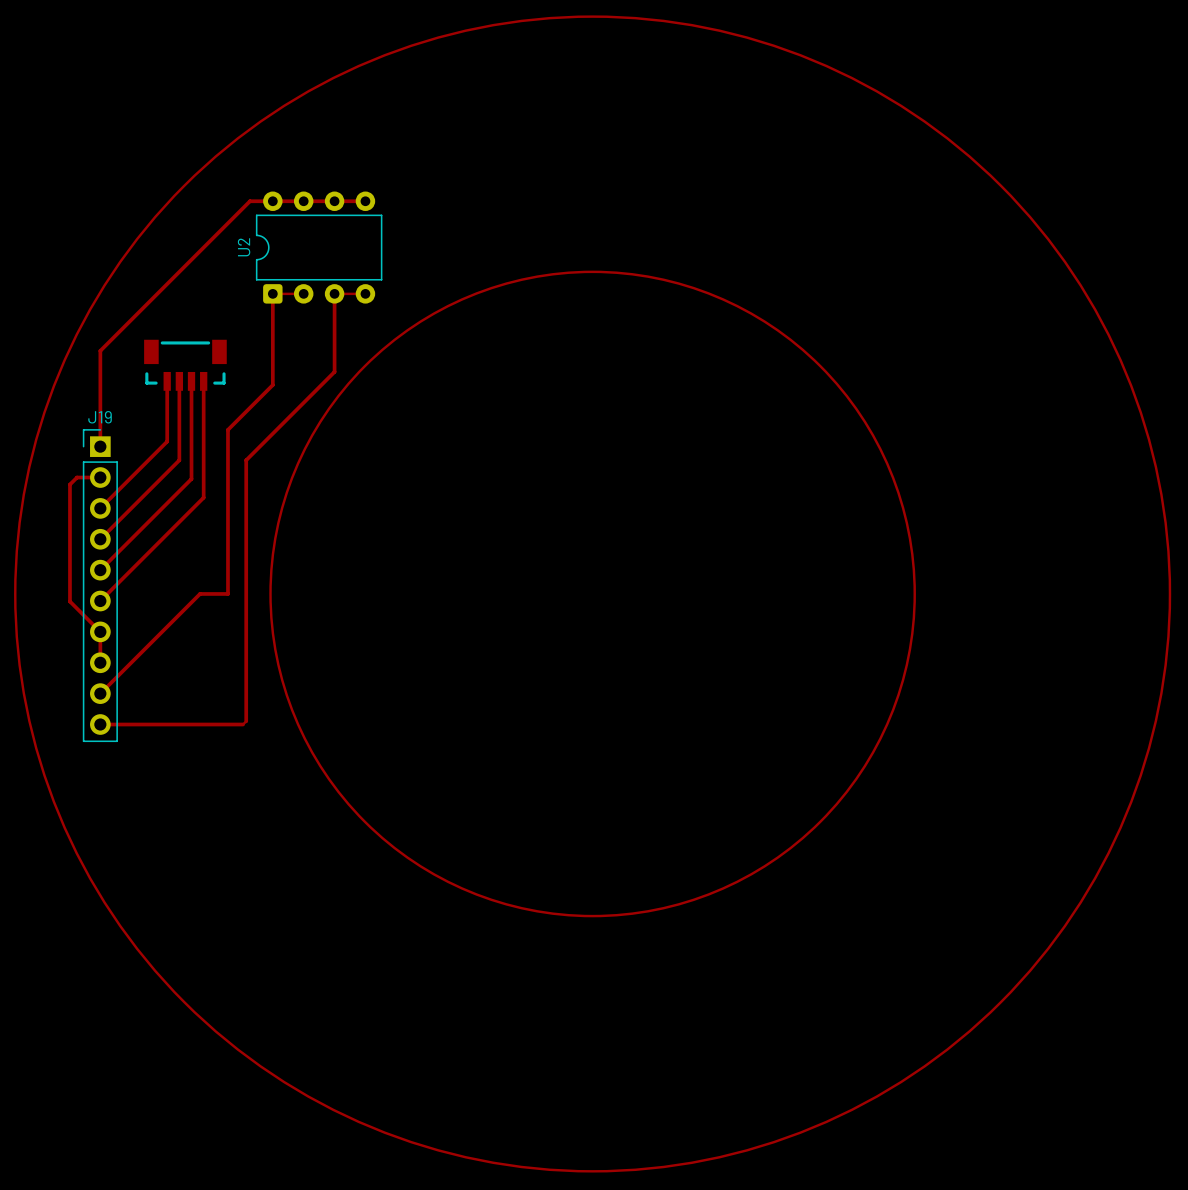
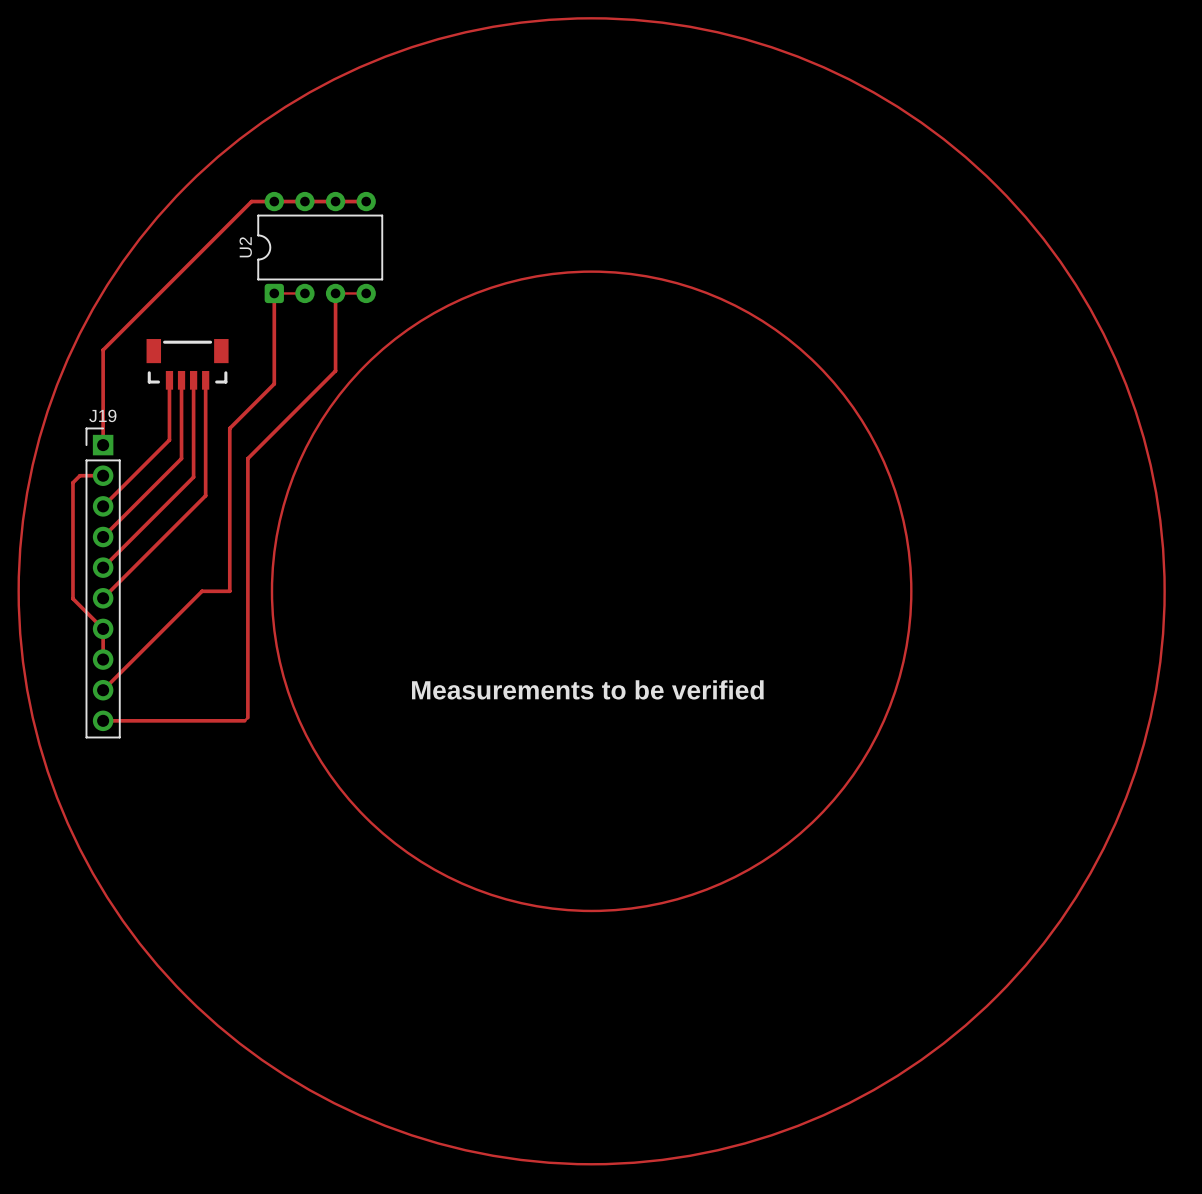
text: none -> Measurements to be verified (587, 689)

